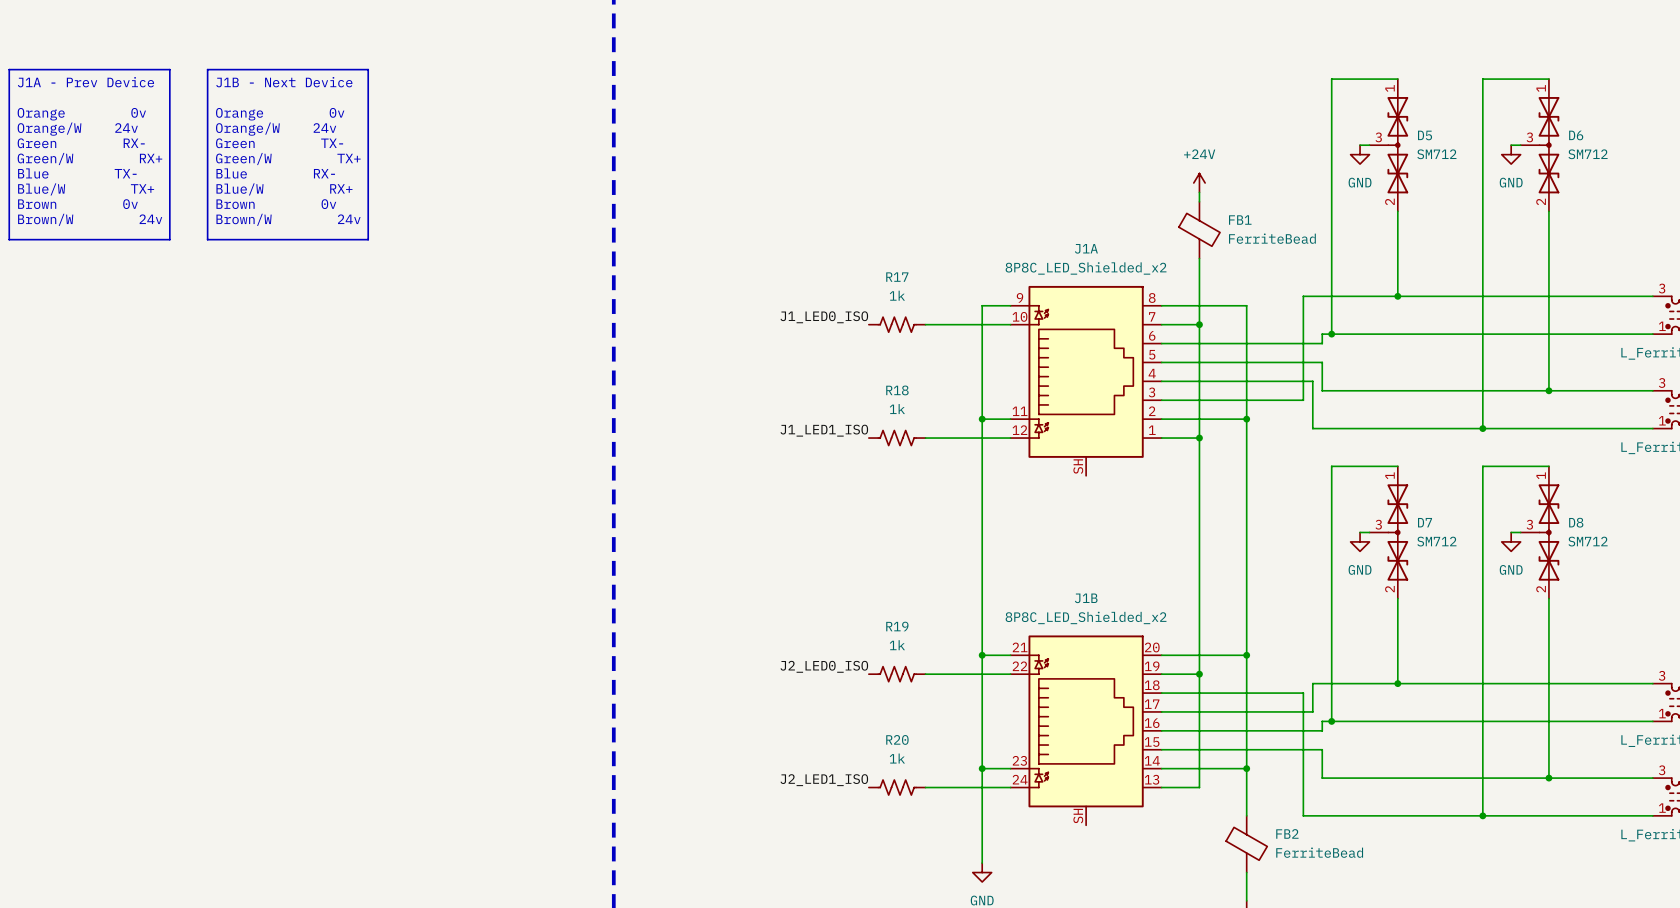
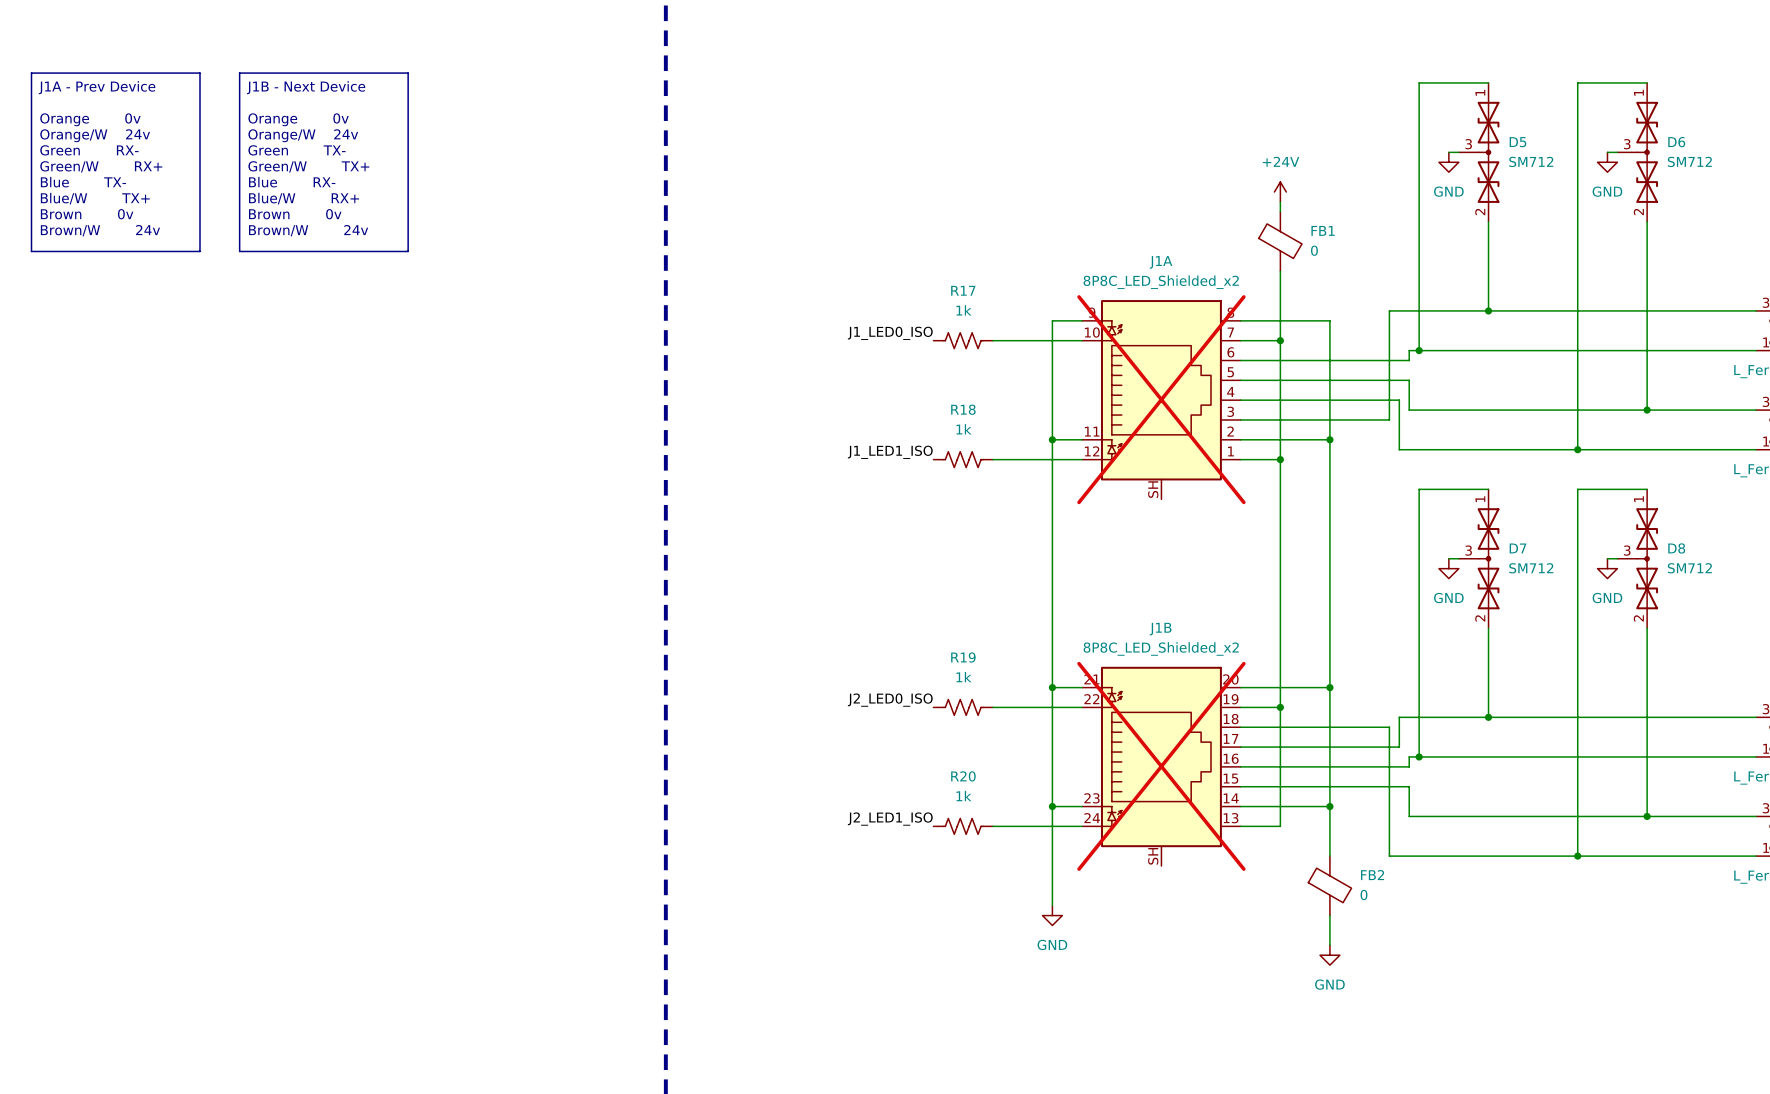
FB1 value: FerriteBead (1272, 238) -> 0 (1314, 250)
J1A do-not-place cross: none -> (1161, 399)
J1B do-not-place cross: none -> (1161, 766)
FB2 value: FerriteBead (1319, 852) -> 0 (1363, 894)

